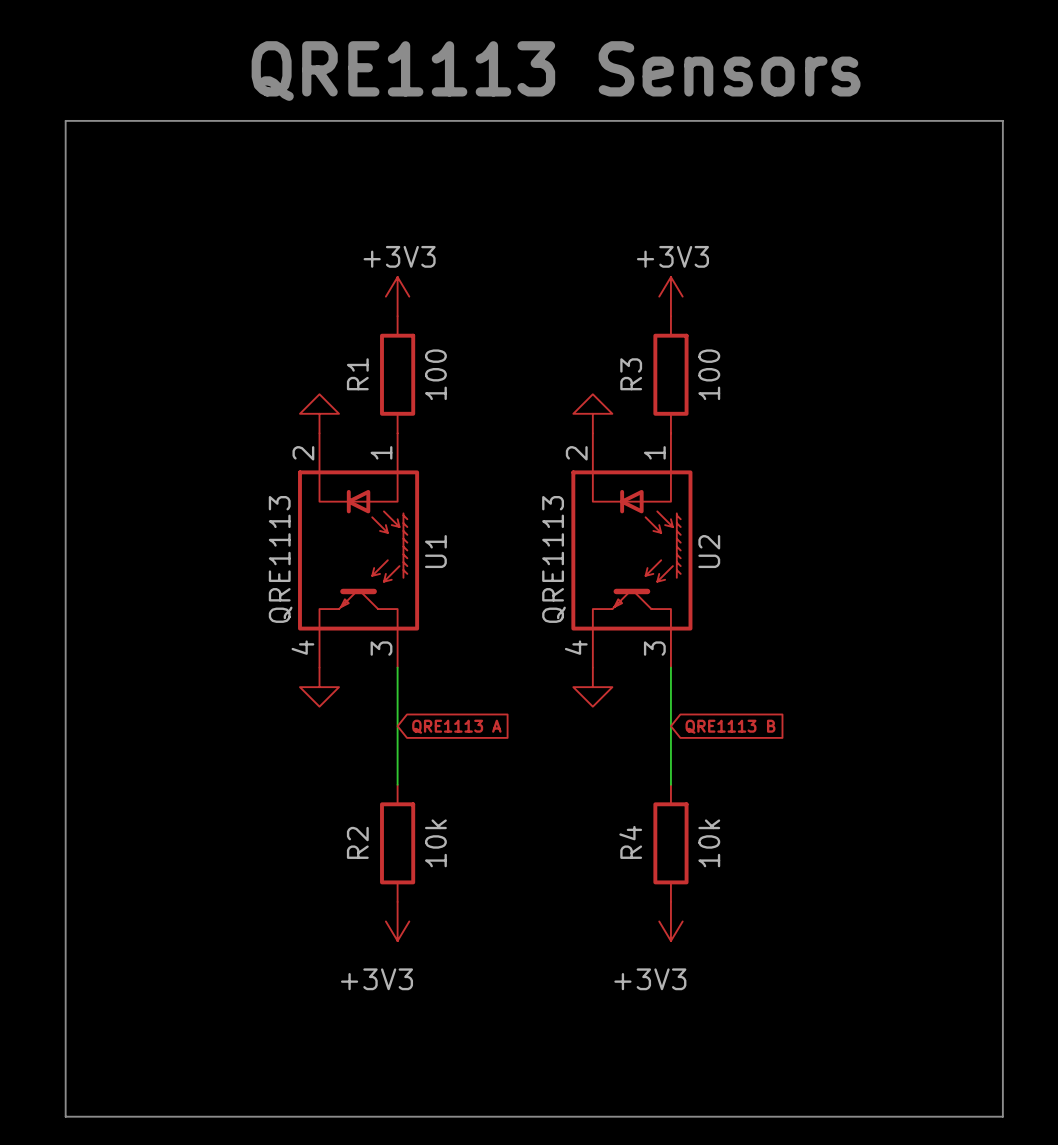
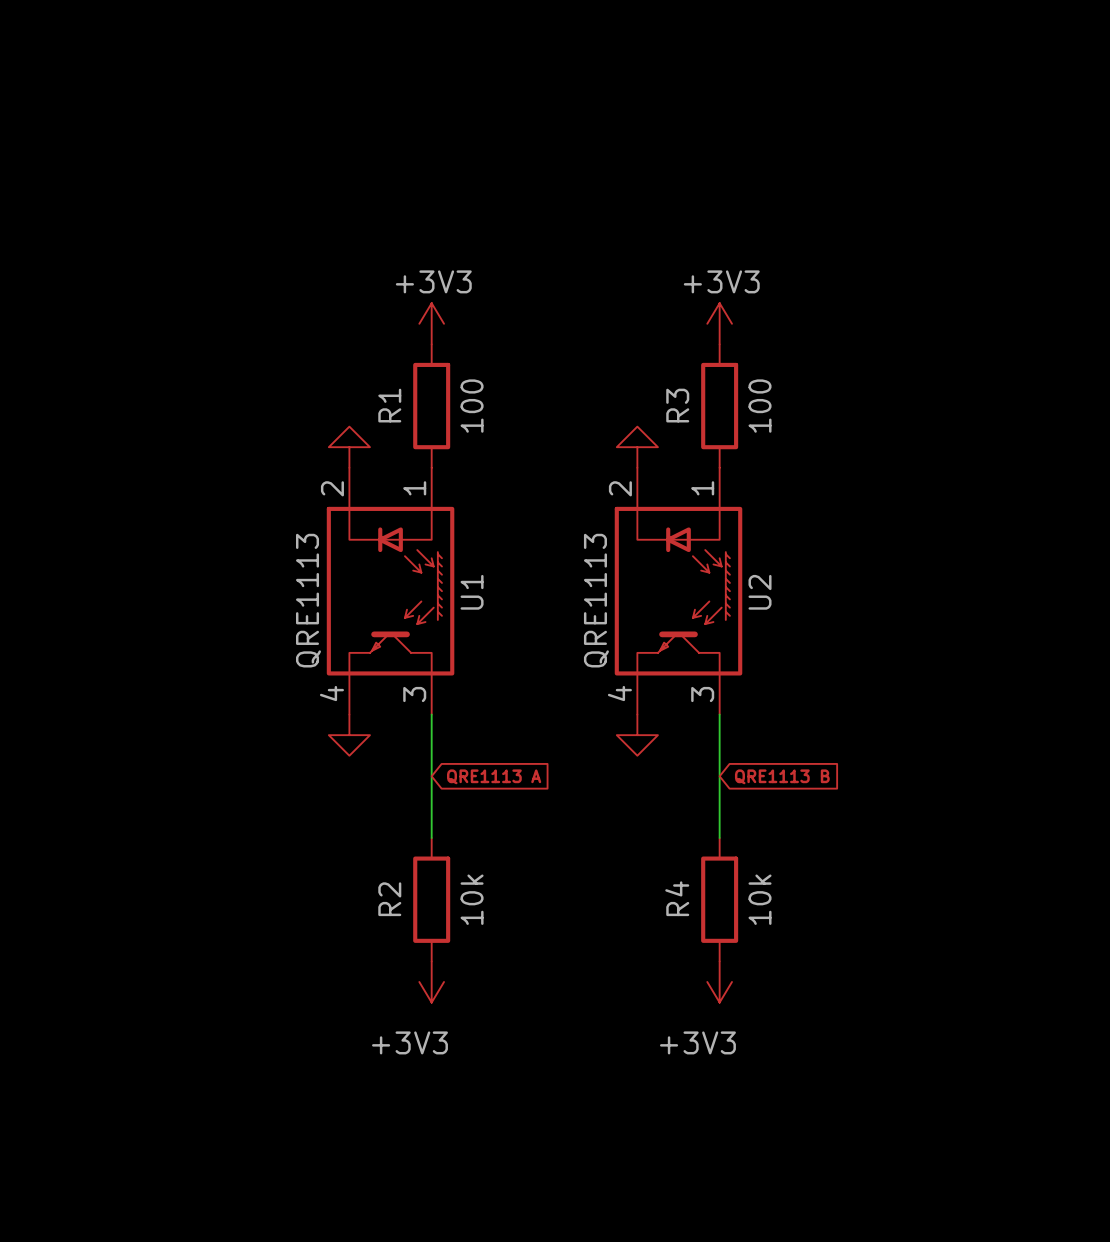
text: QRE1113 Sensors (556, 71) -> none
line: (65, 120) (1002, 120) (1002, 1116) (65, 1116) (65, 120) -> none

